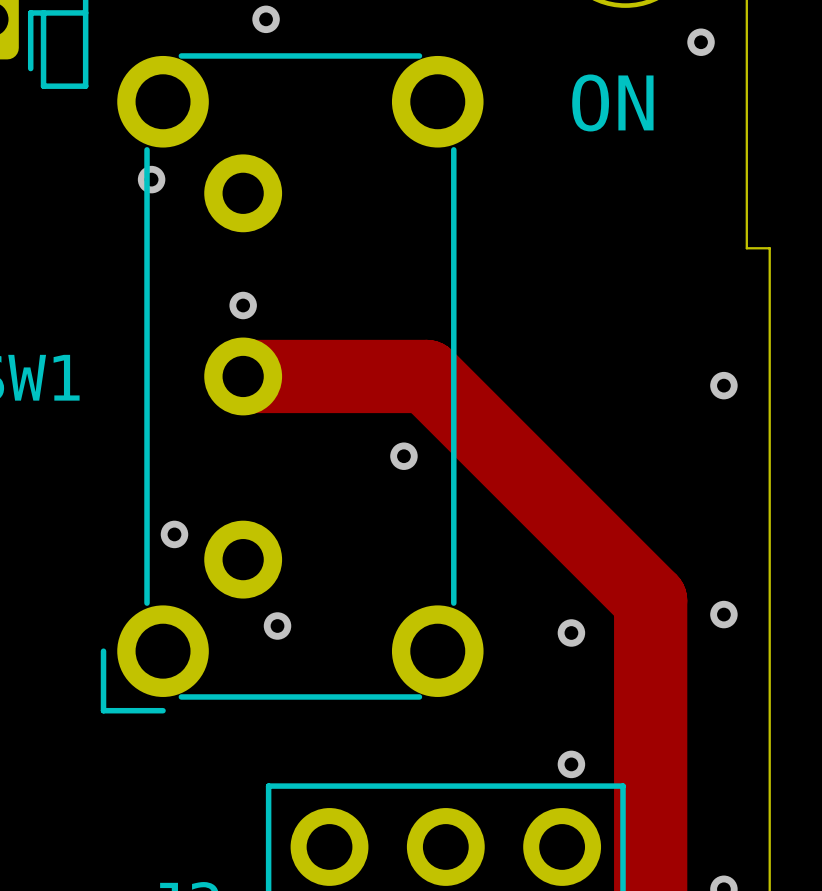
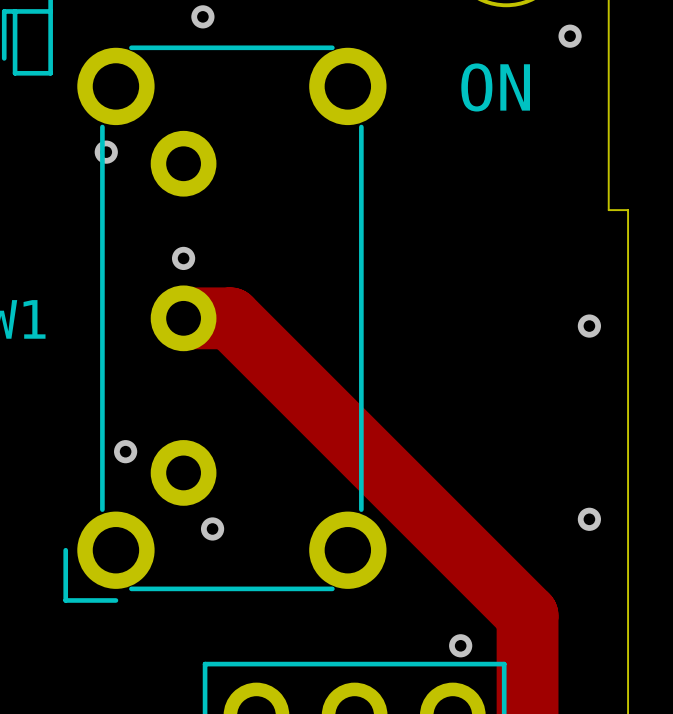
track: (298, 376) (426, 376) (650, 600) (650, 728) -> (230, 318) (527, 615)
via: (403, 456) -> none
via: (571, 632) -> none

